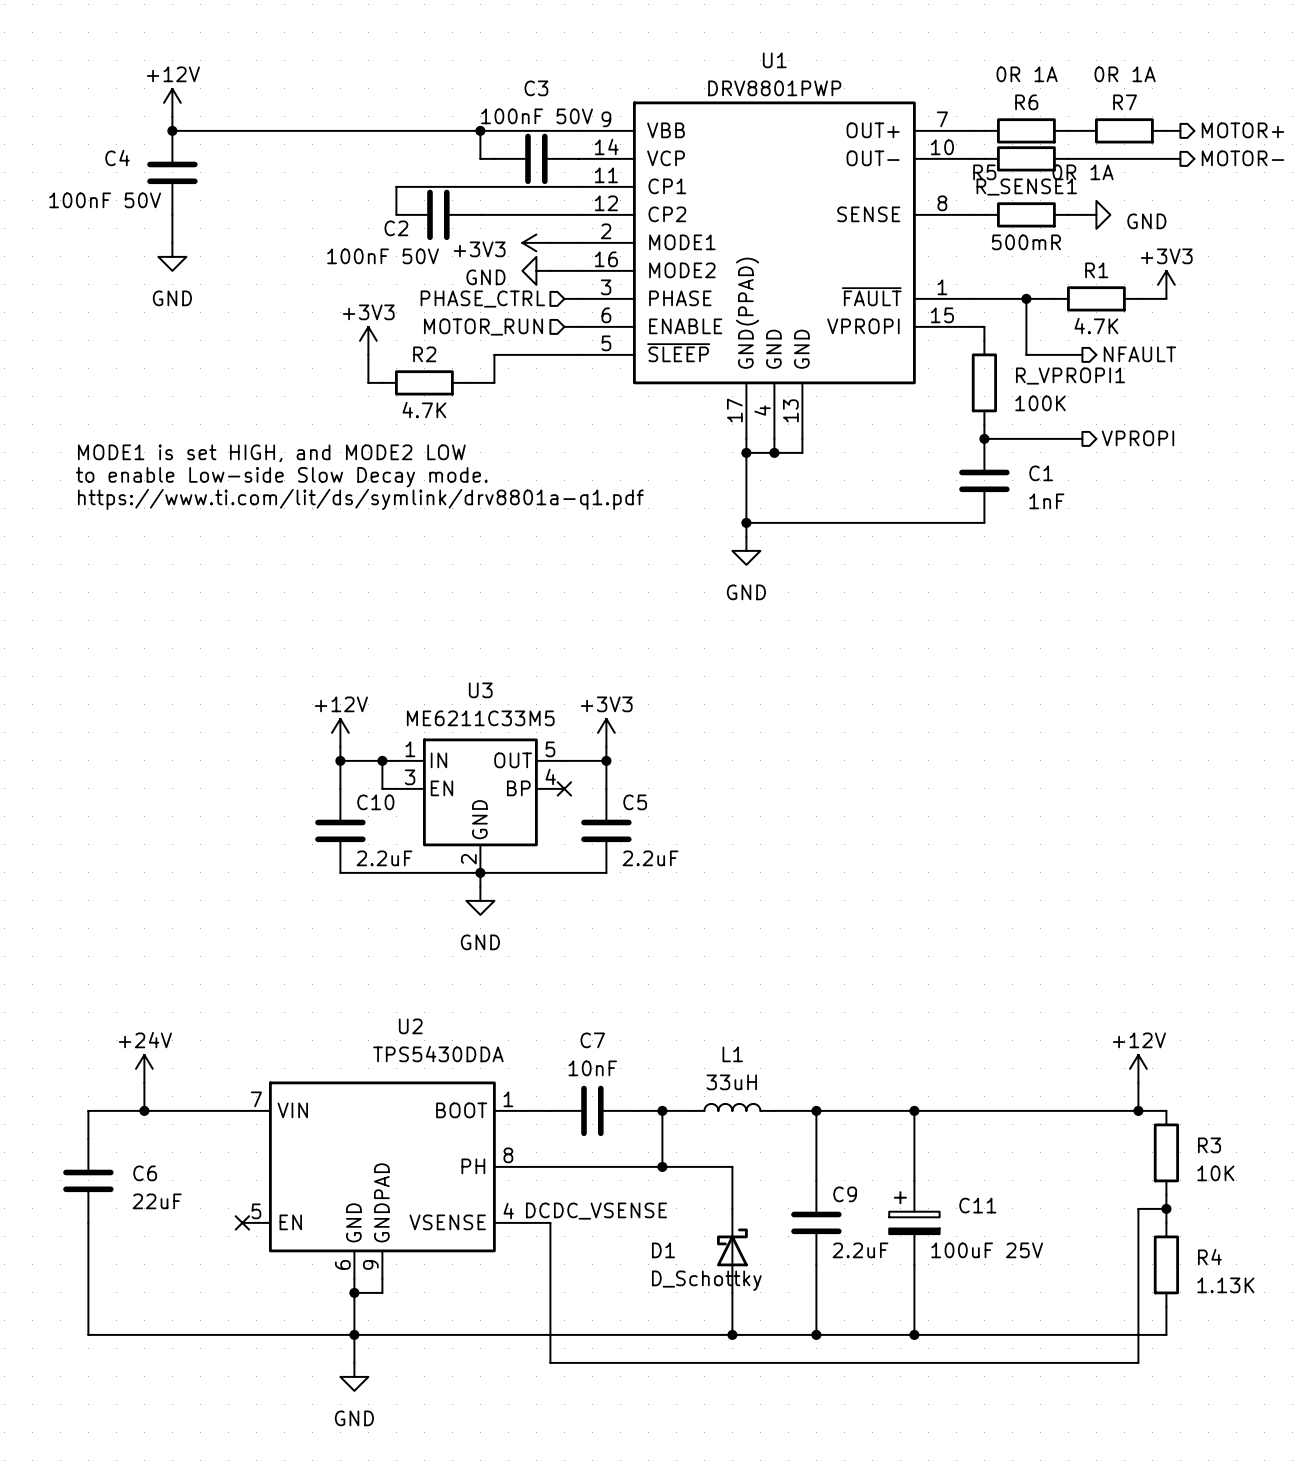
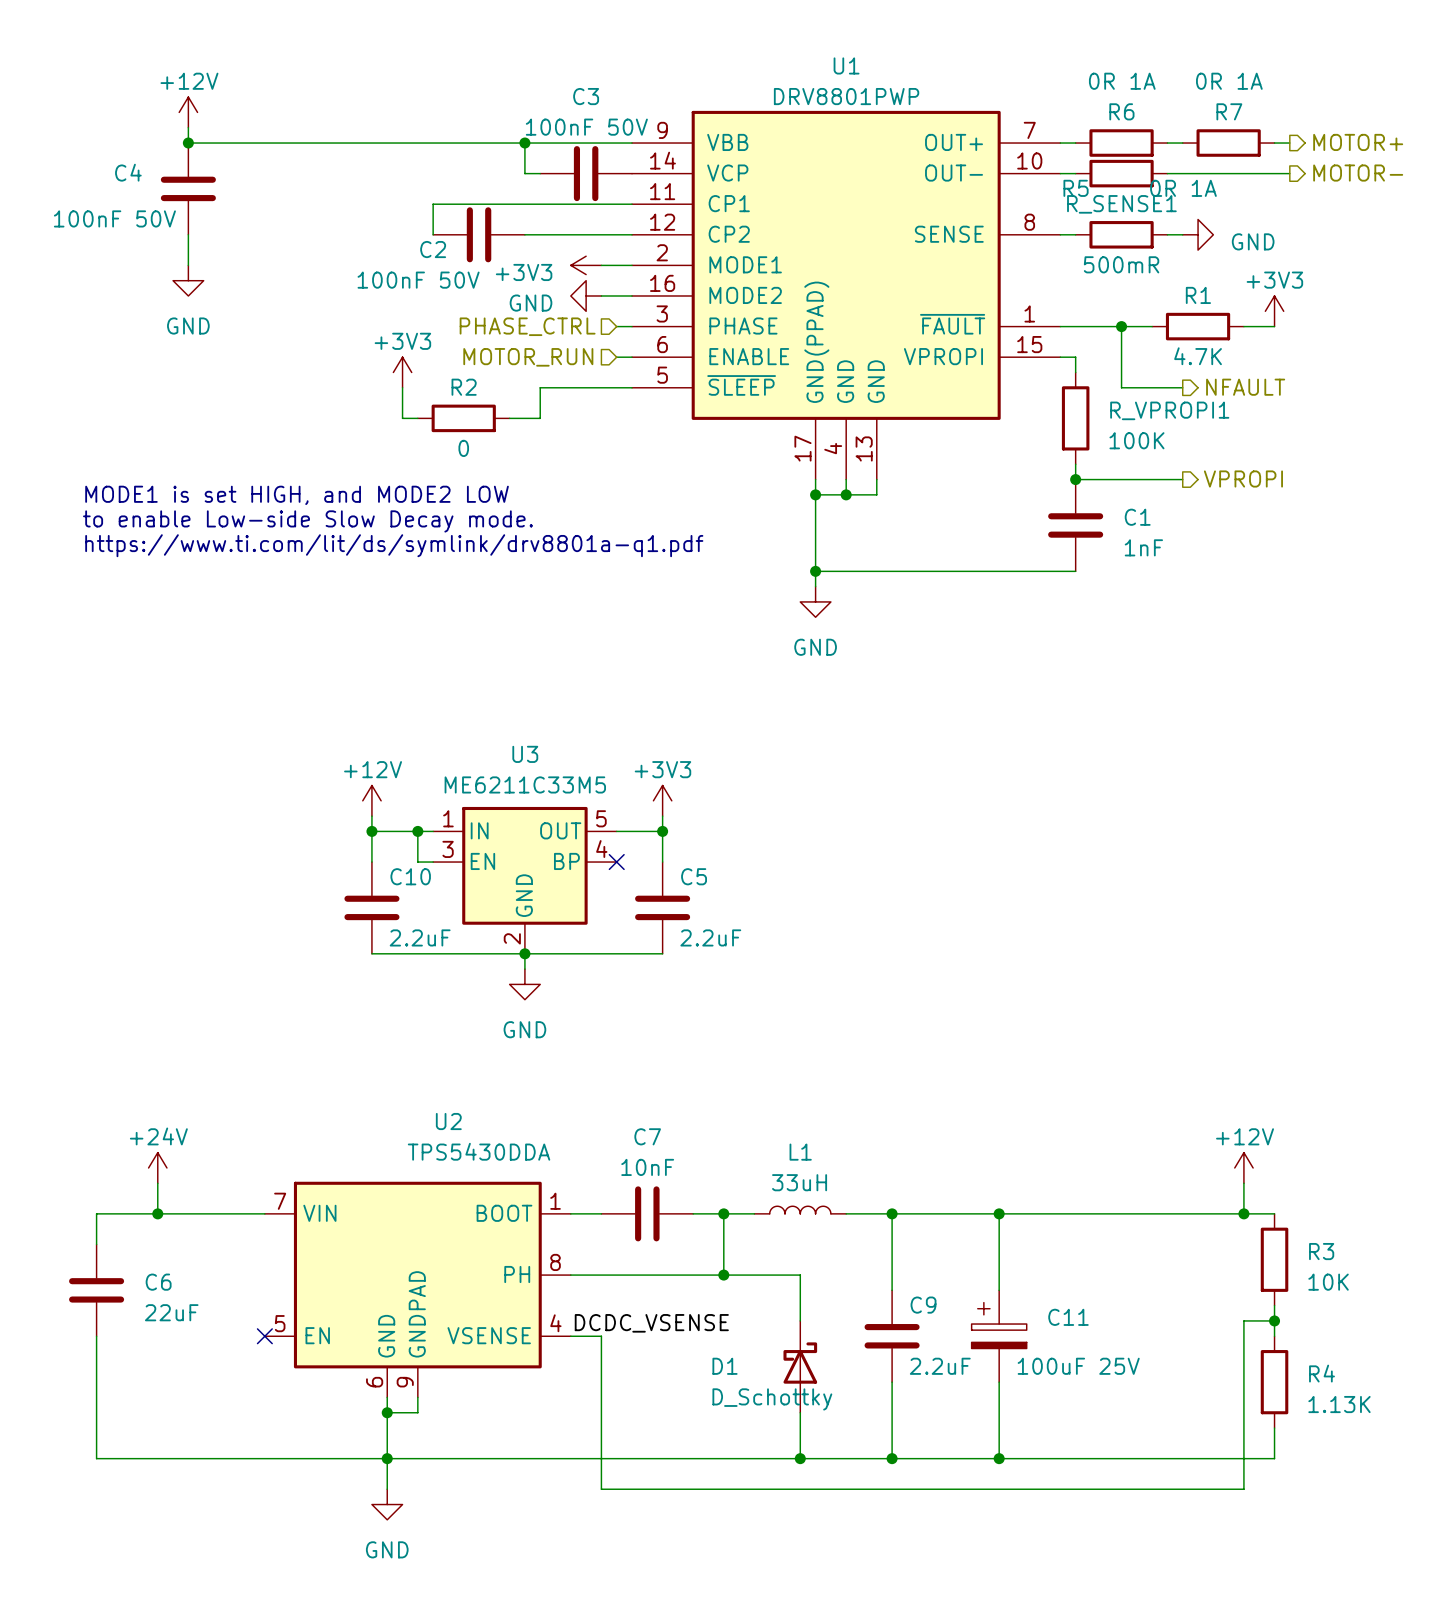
R2 value: 4.7K (424, 410) -> 0 (463, 448)

